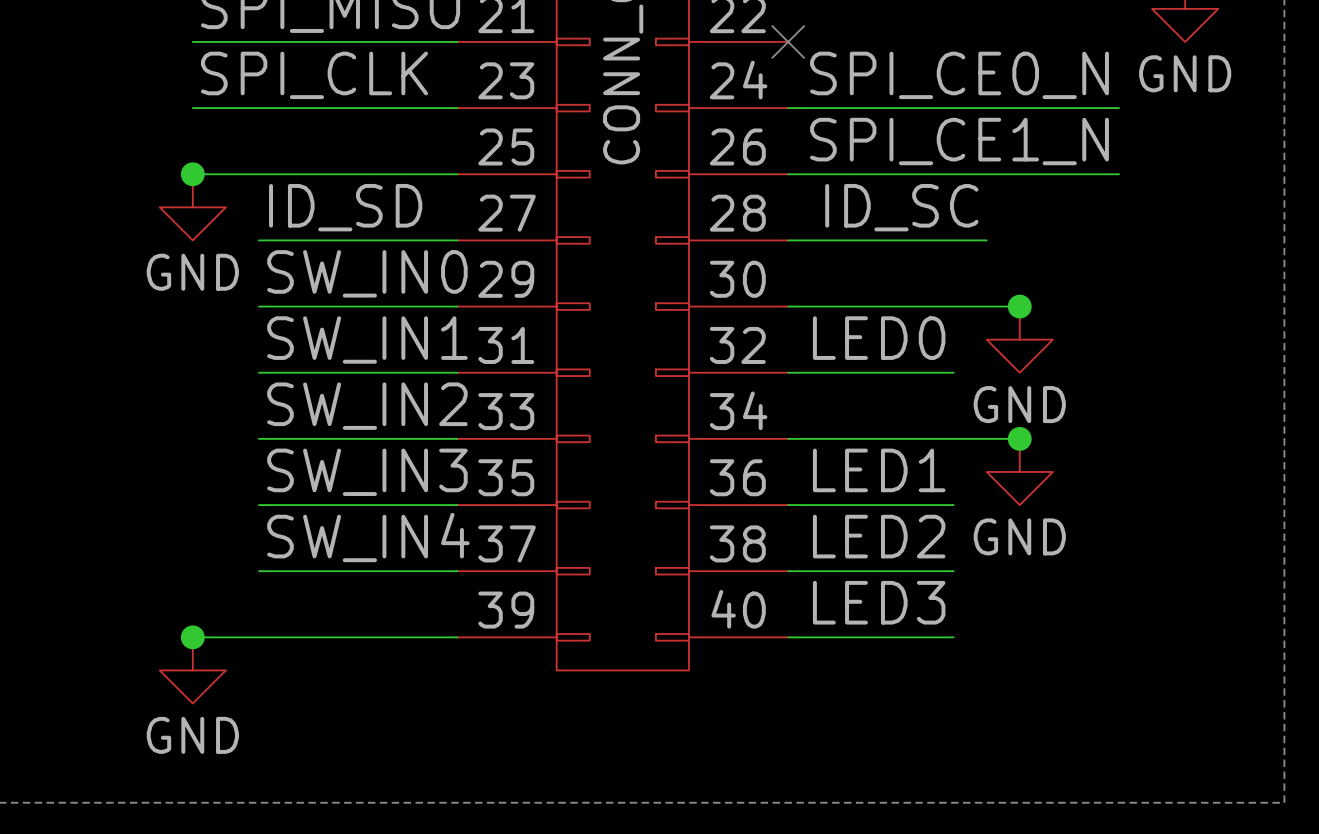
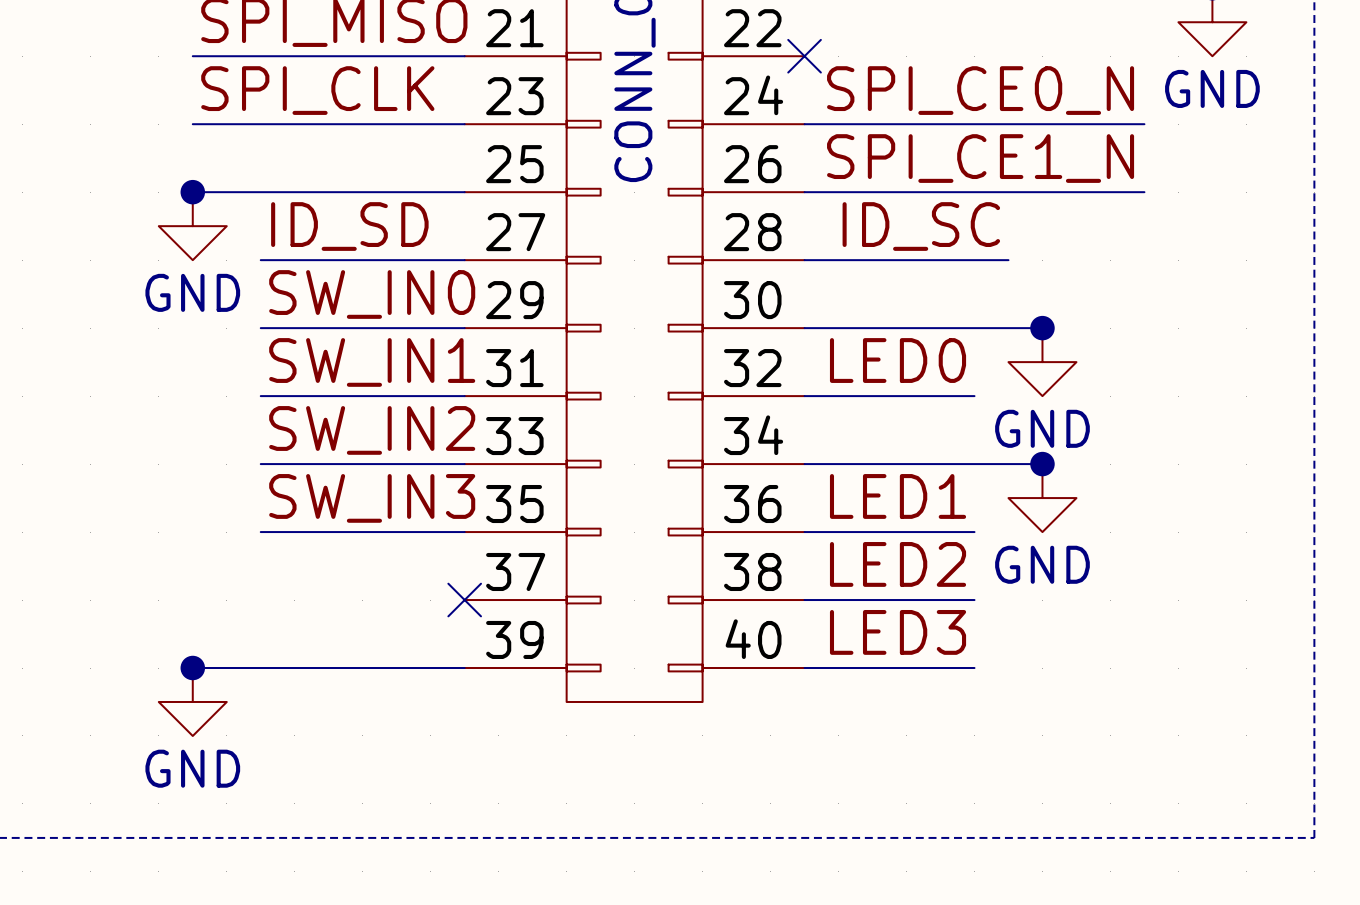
label: SW_IN4 (368, 537) -> none
wire: (258, 571) (457, 571) -> none
no-connect mark: none -> (464, 600)

